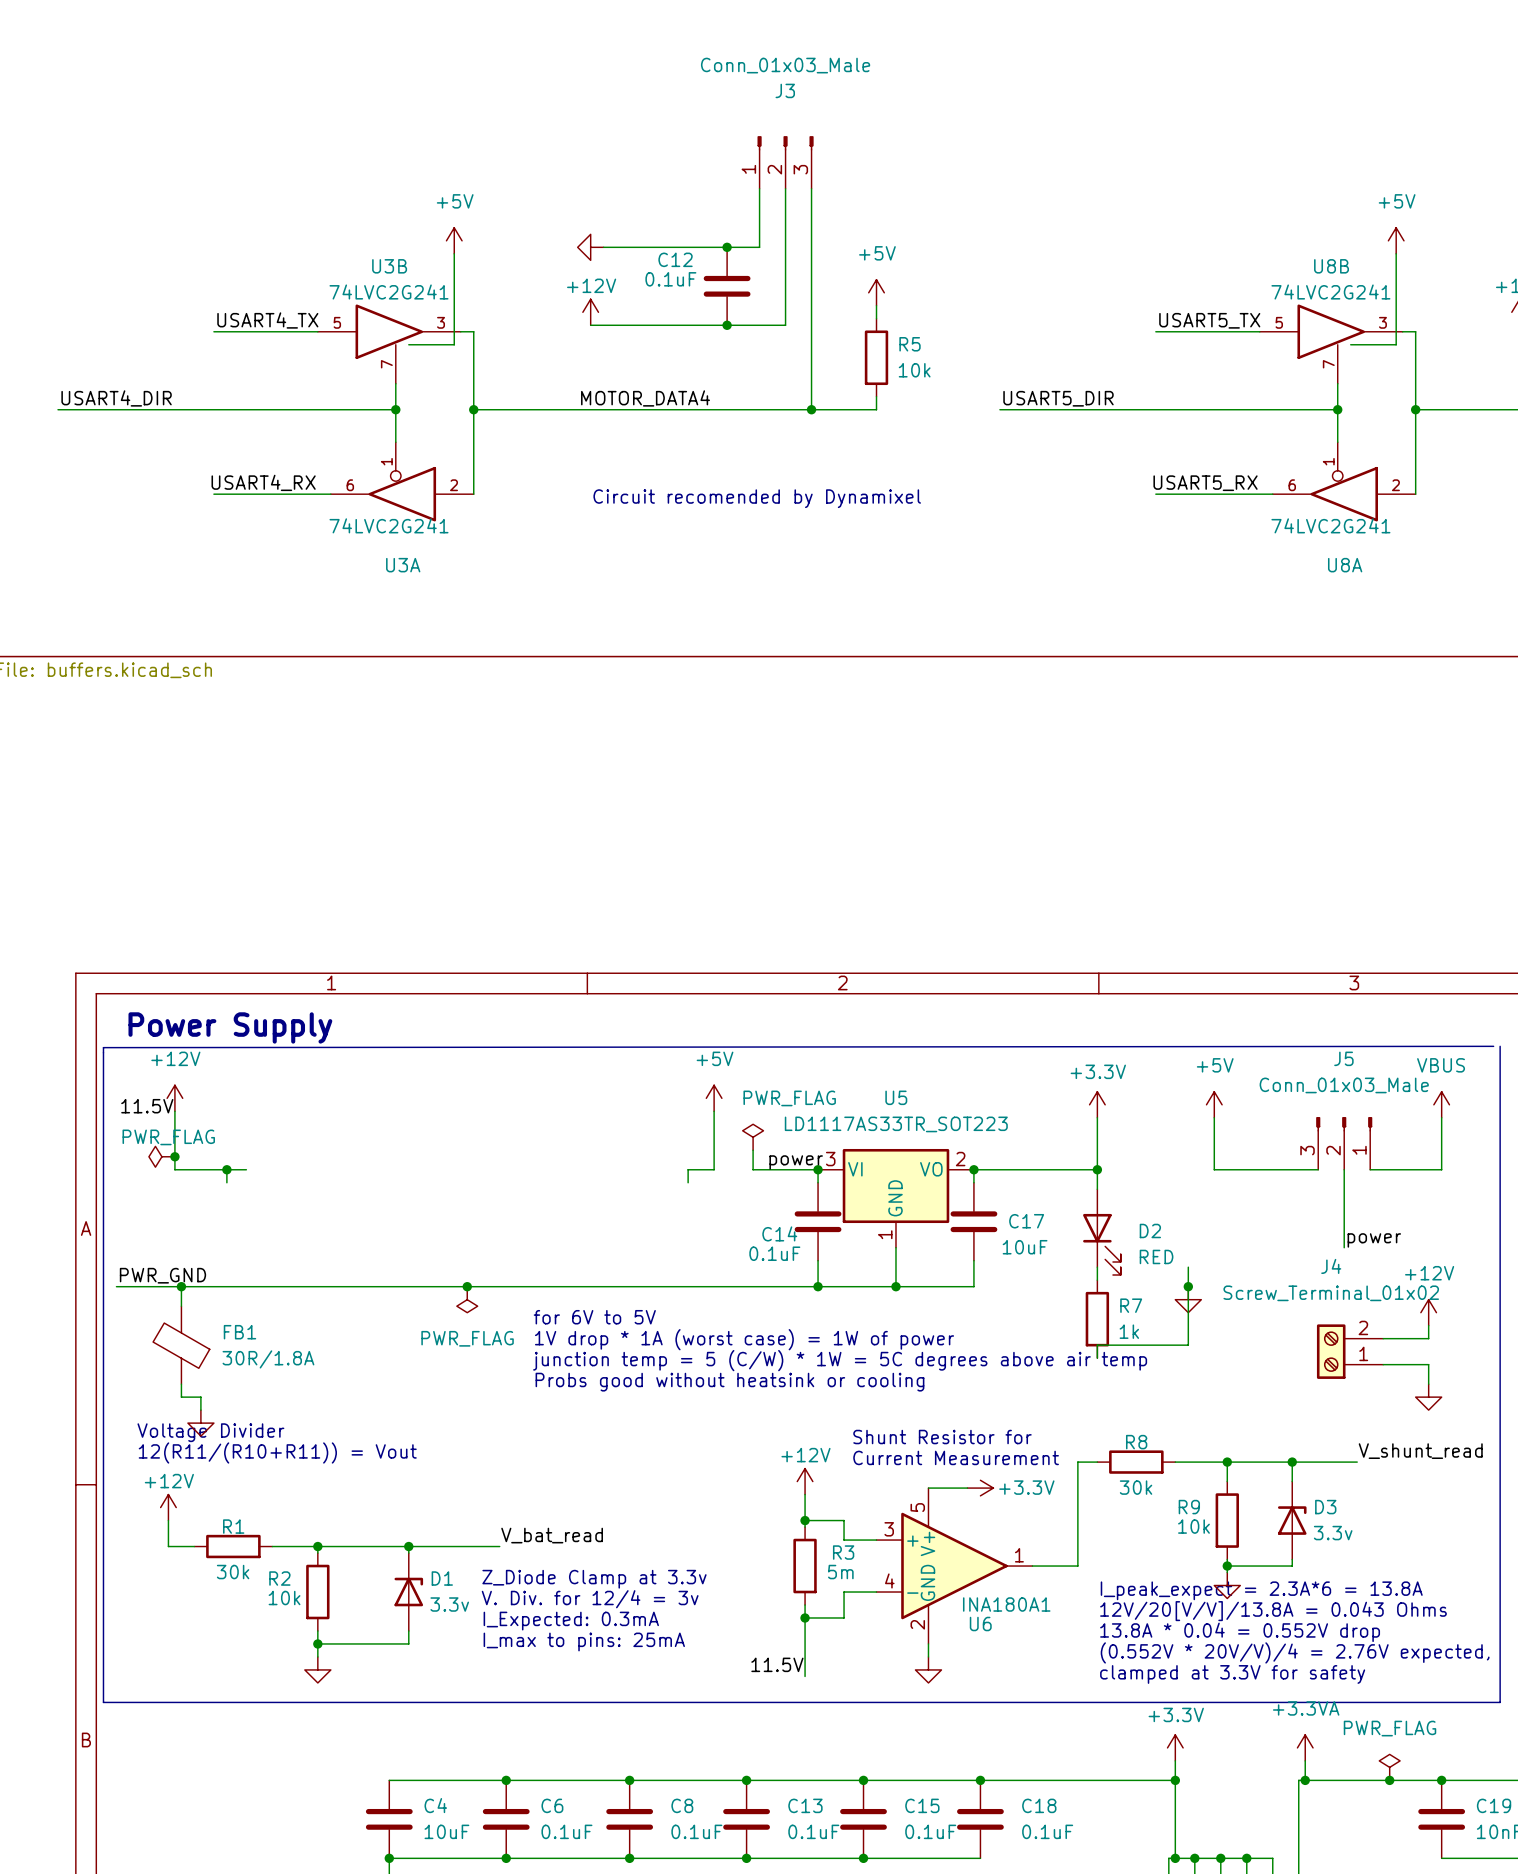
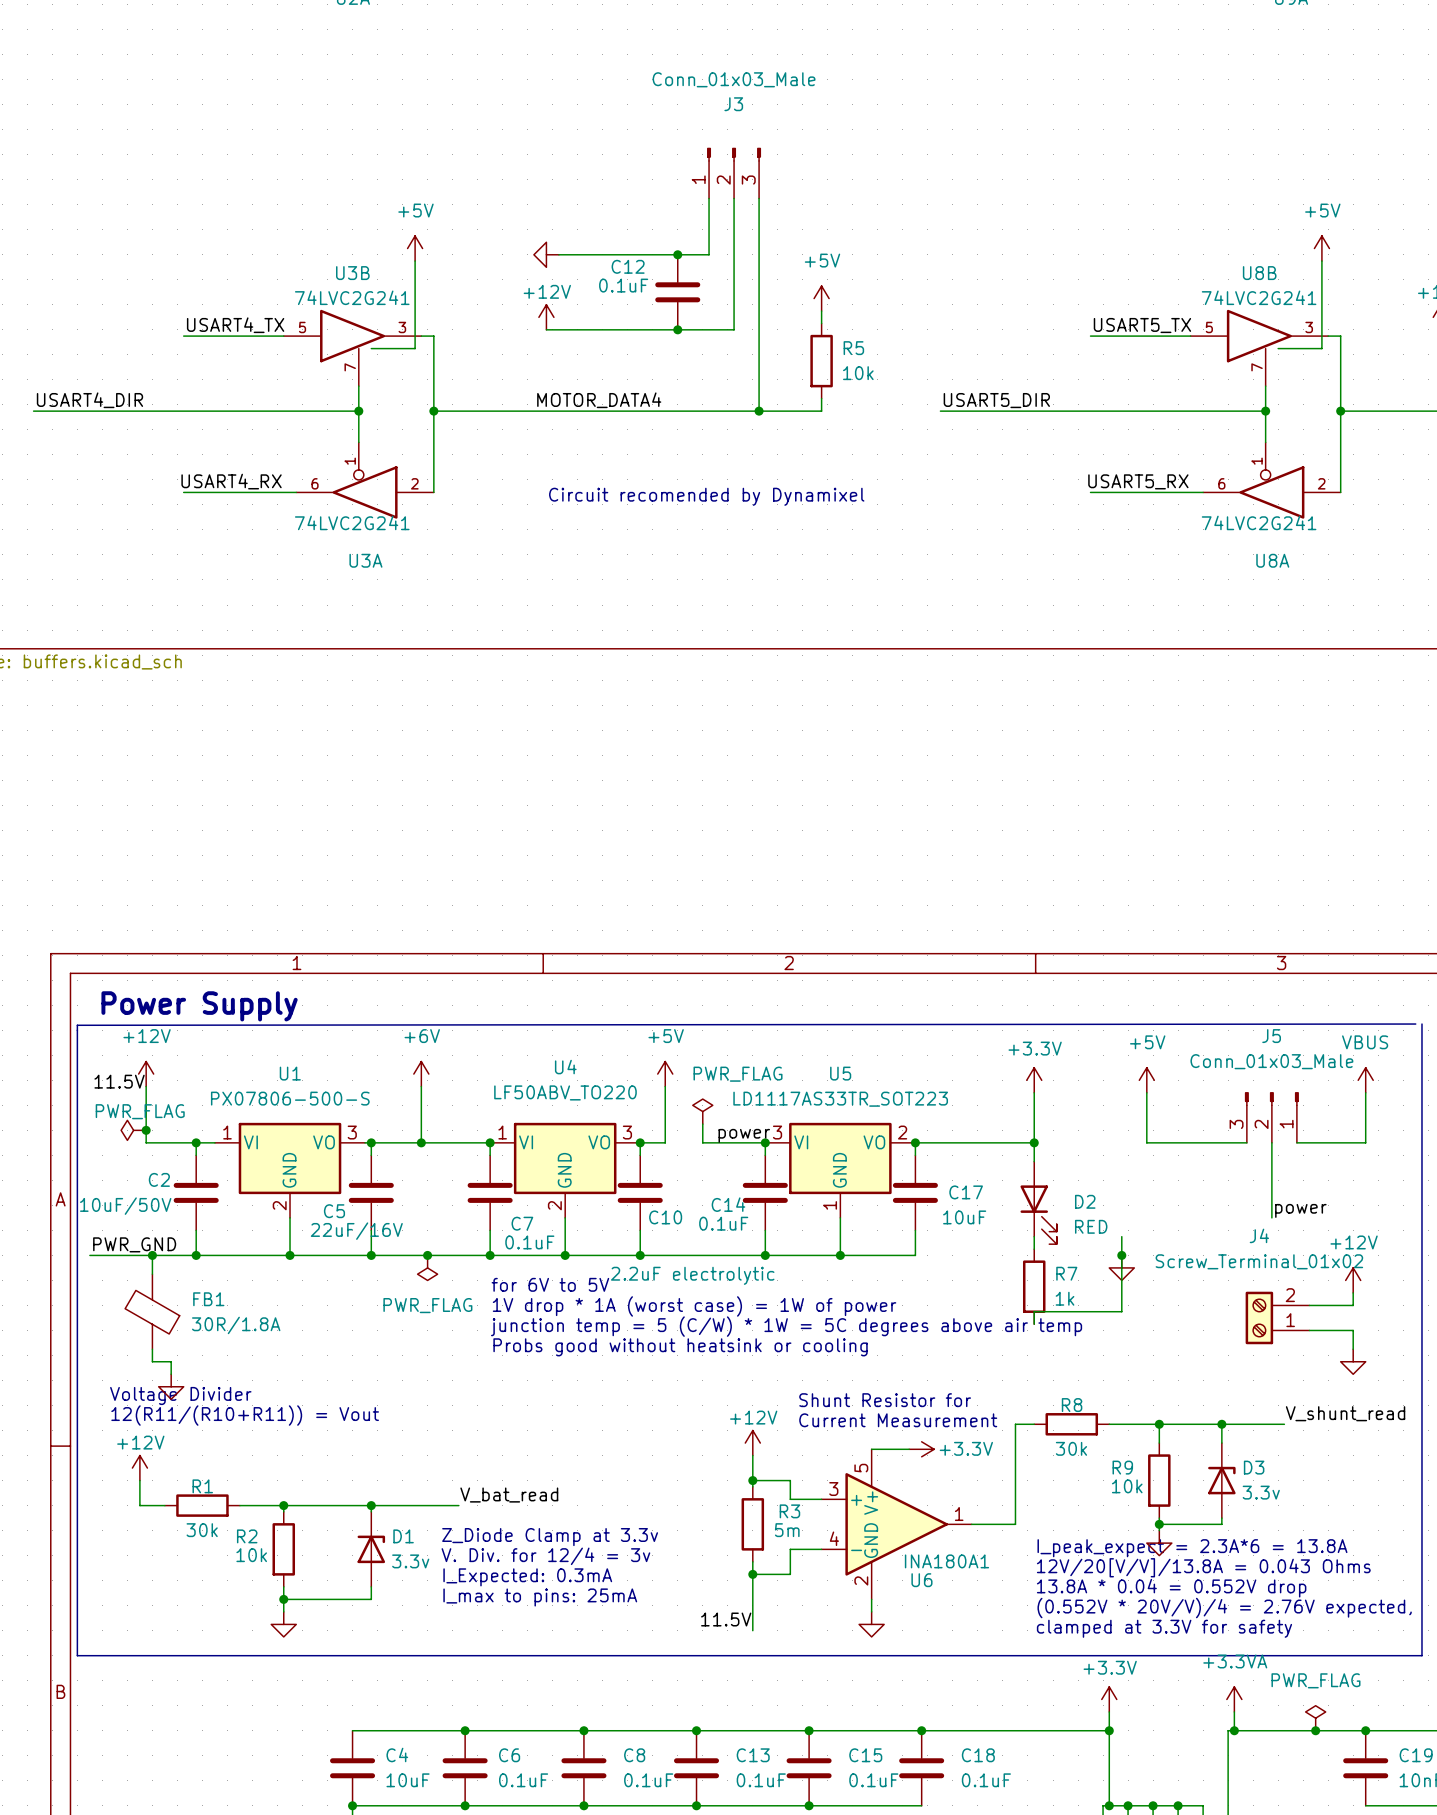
power symbol: none -> +6V (421, 1074)
wire: none -> (421, 1086) (421, 1142)
wire: none -> (365, 1142) (490, 1142) (490, 1155)
wire: none -> (371, 1142) (371, 1155)
junction: none -> (371, 1142)
junction: none -> (421, 1142)
junction: none -> (490, 1142)
junction: none -> (640, 1142)
U1: none -> PX07806-500-S (290, 1170)
U4: none -> LF50ABV_TO220 (565, 1170)
C2: none -> 10uF/50V (196, 1192)
C5: none -> 22uF/16V (371, 1192)
C7: none -> 0.1uF (490, 1192)
C10: none -> 2.2uF electrolytic (640, 1192)
wire: none -> (290, 1217) (290, 1255)
wire: none -> (565, 1217) (565, 1255)
wire: none -> (196, 1230) (196, 1255)
wire: none -> (371, 1230) (371, 1255)
wire: none -> (490, 1230) (490, 1255)
wire: none -> (640, 1230) (640, 1255)
junction: none -> (196, 1255)
junction: none -> (290, 1255)
junction: none -> (371, 1255)
junction: none -> (490, 1255)
junction: none -> (565, 1255)
junction: none -> (640, 1255)

